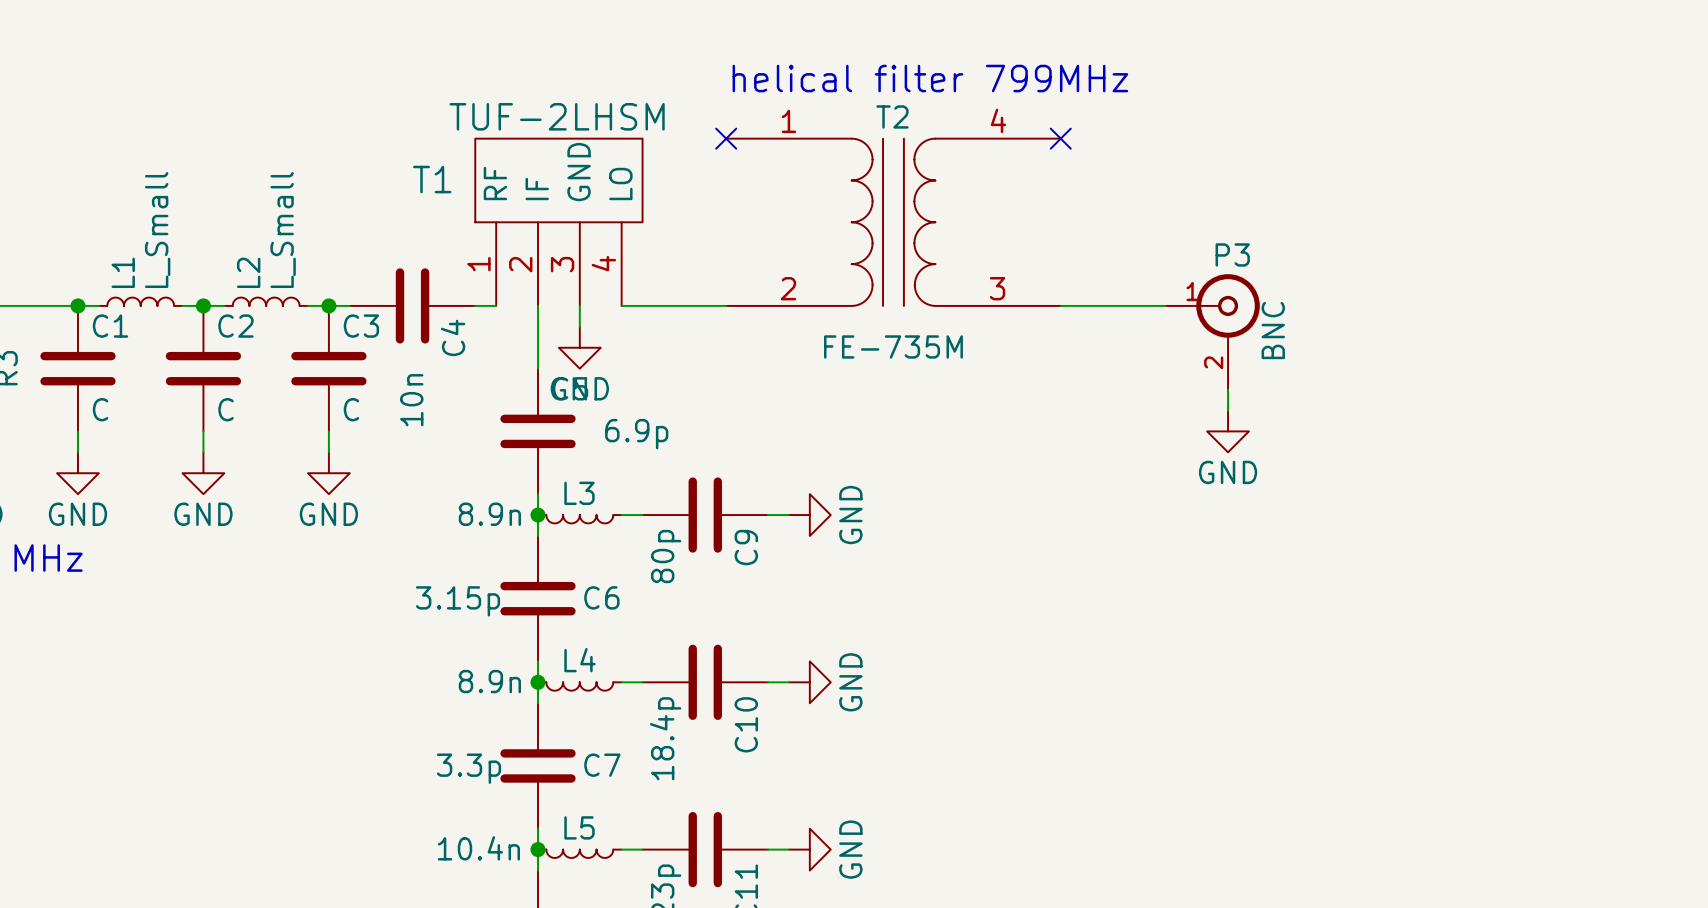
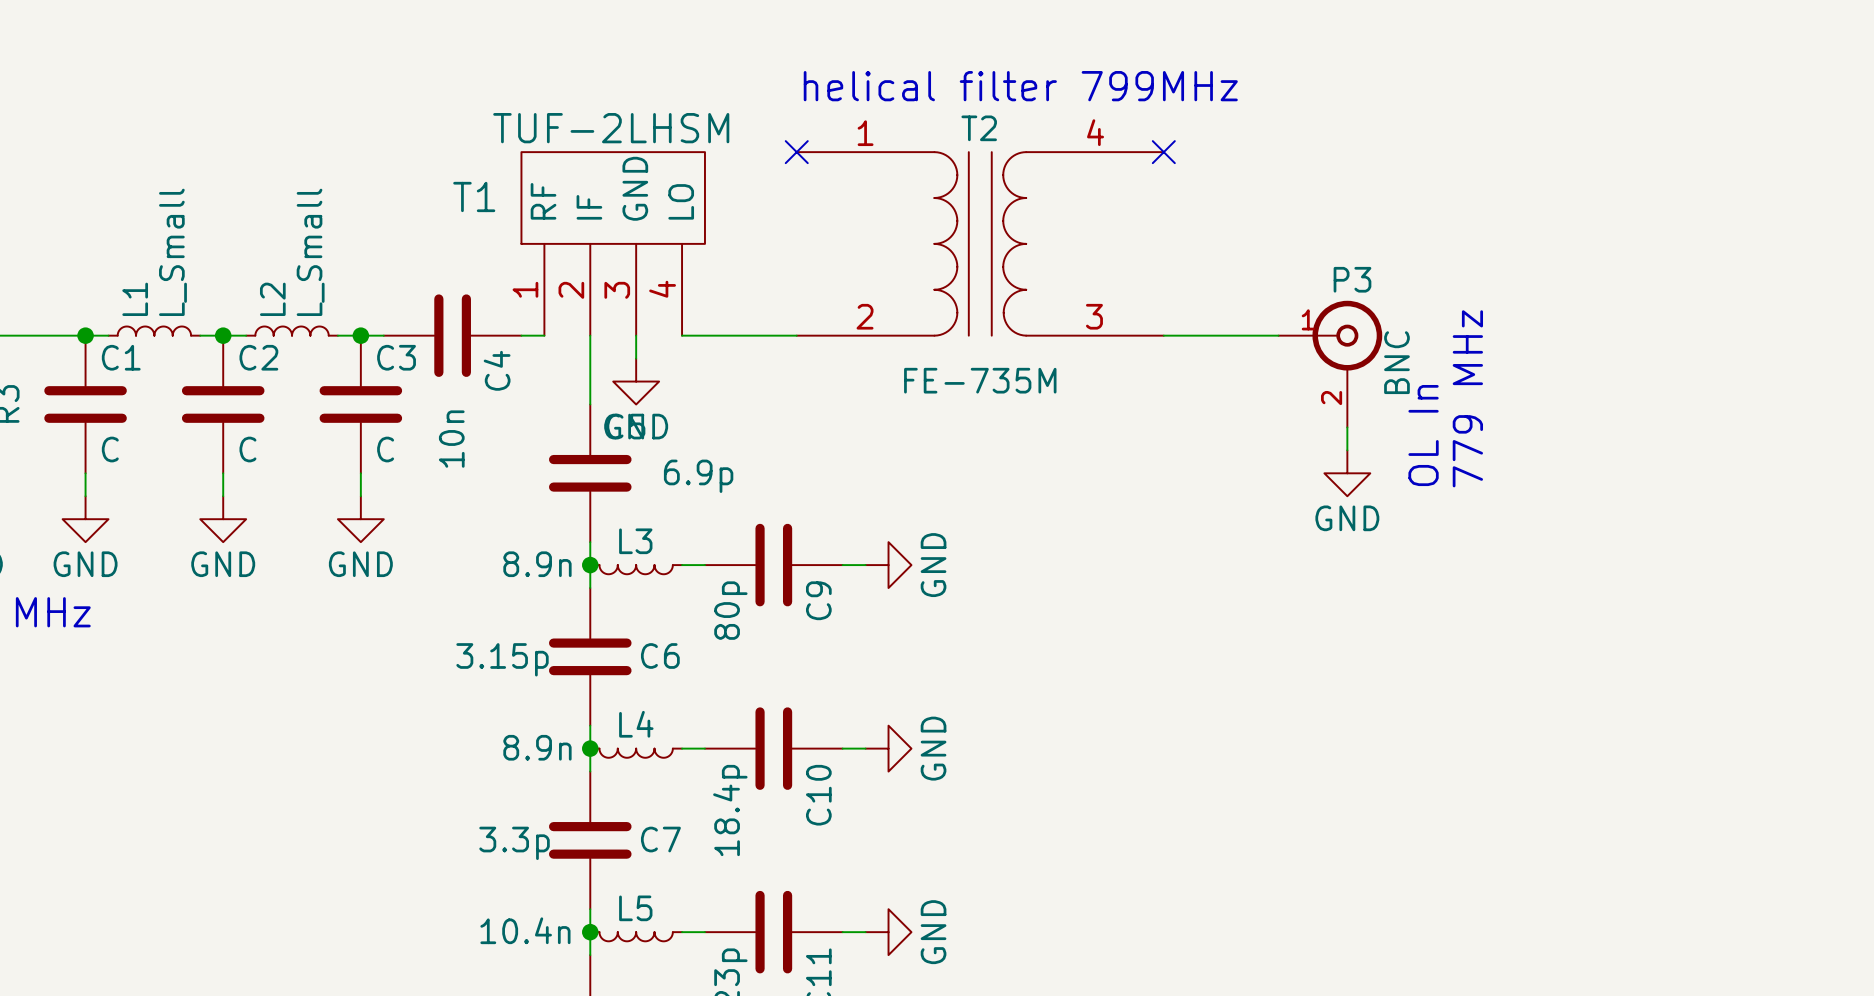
text: none -> 779 MHz (1467, 398)
text: none -> OL In (1423, 435)

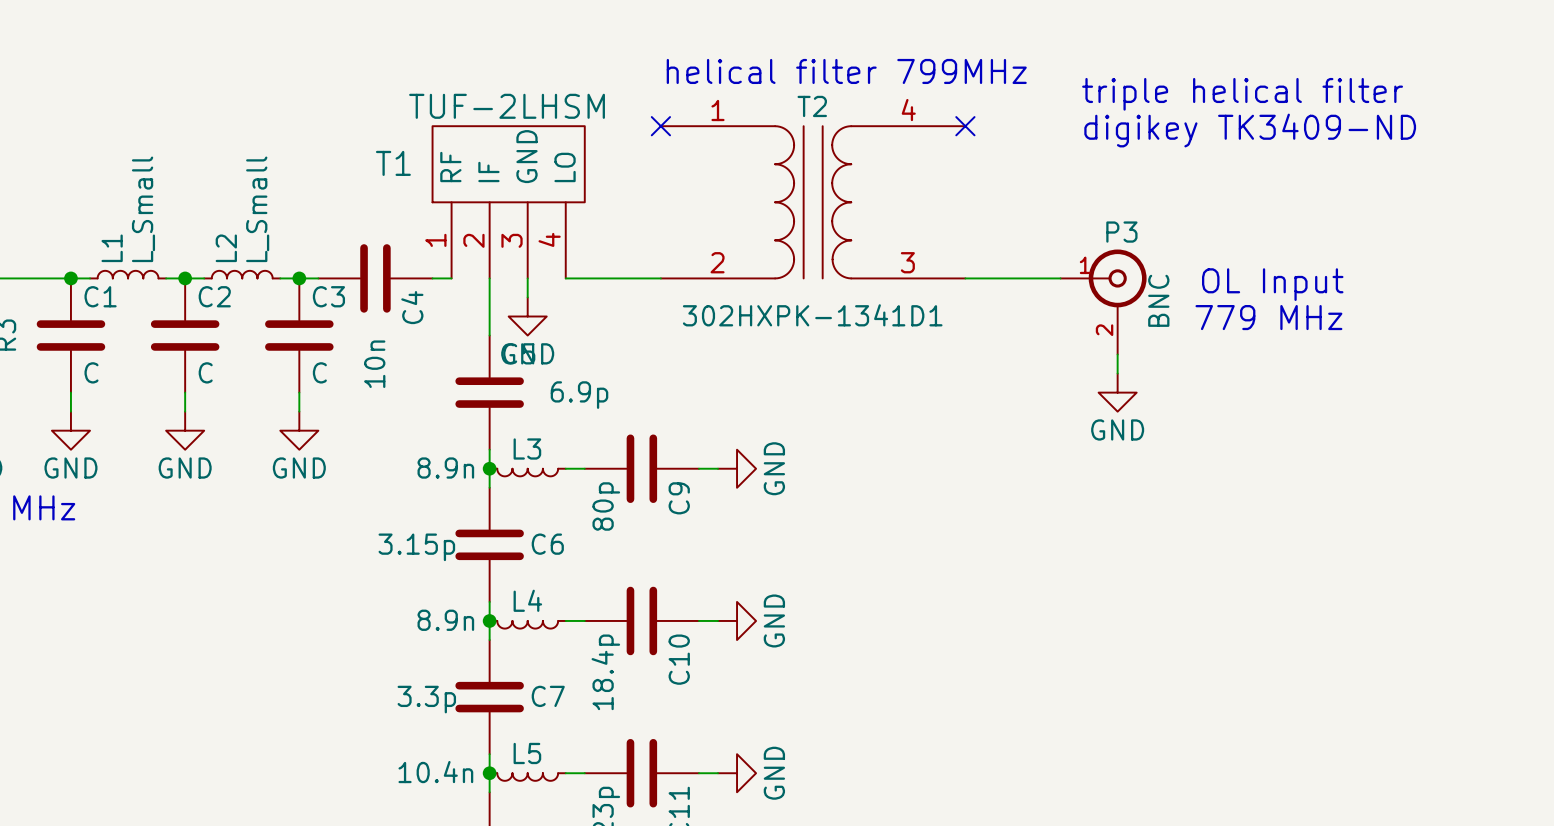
text: none -> triple helical filter (1242, 94)
text: none -> digikey TK3409-ND (1250, 130)
T2 value: FE-735M (980, 380) -> 302HXPK-1341D1 (812, 315)
text rotation: 0° (1467, 398) -> 90° clockwise (1268, 317)
text: OL In (1423, 435) -> OL Input (1272, 284)

